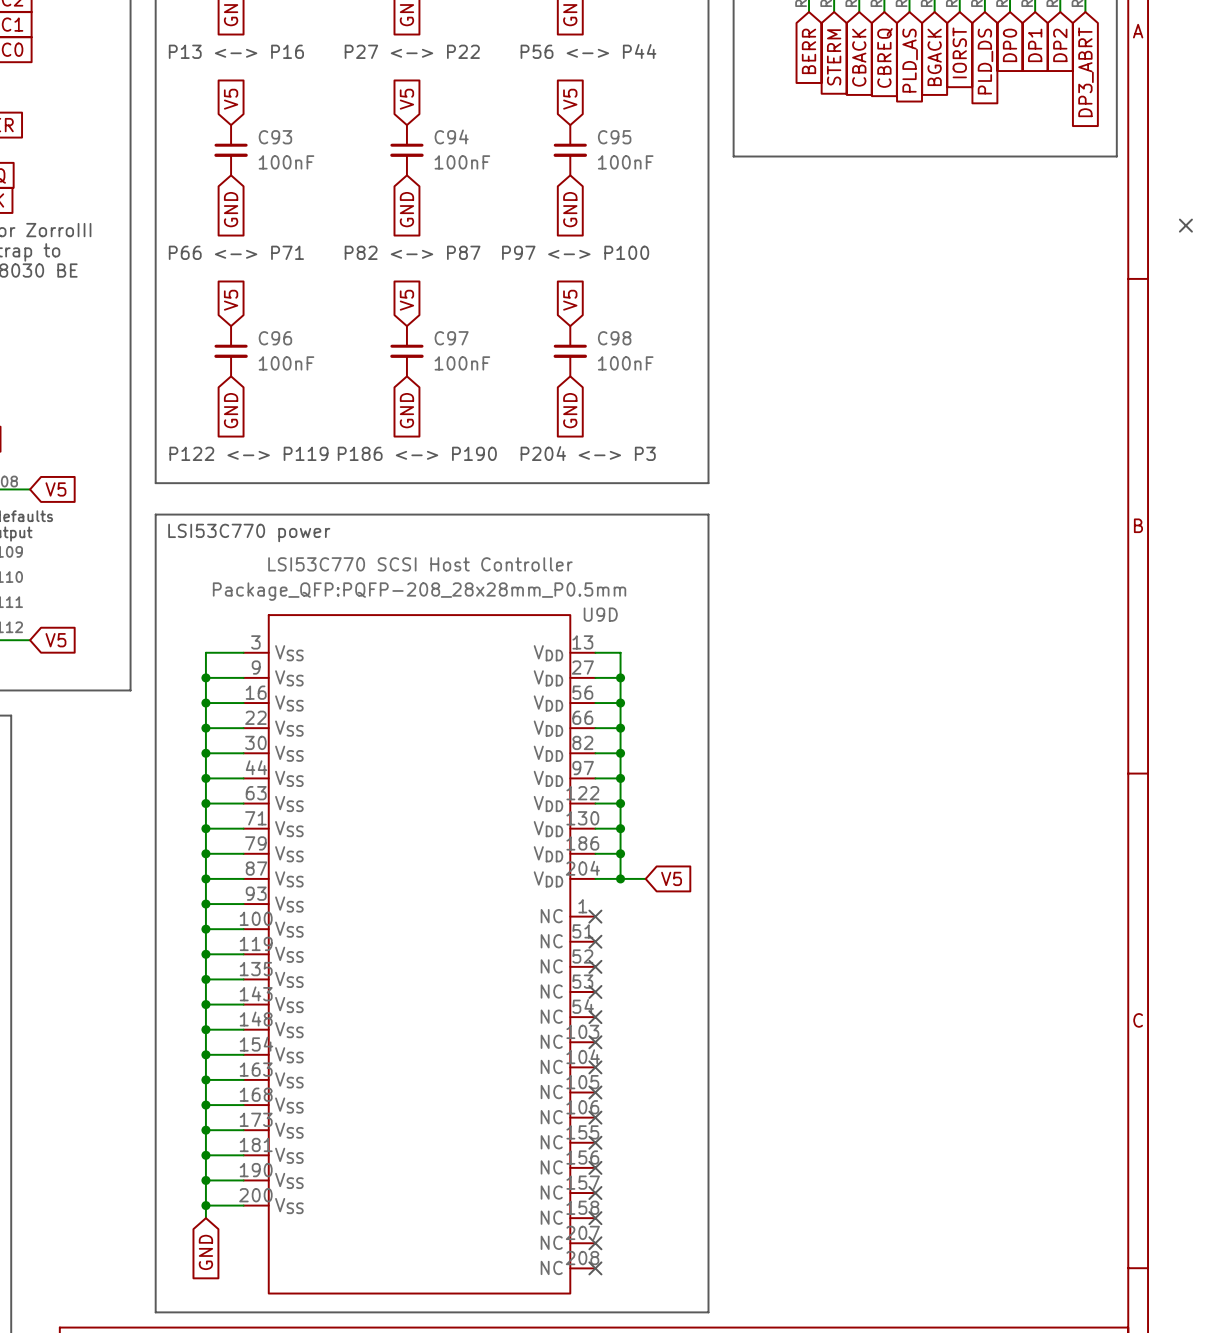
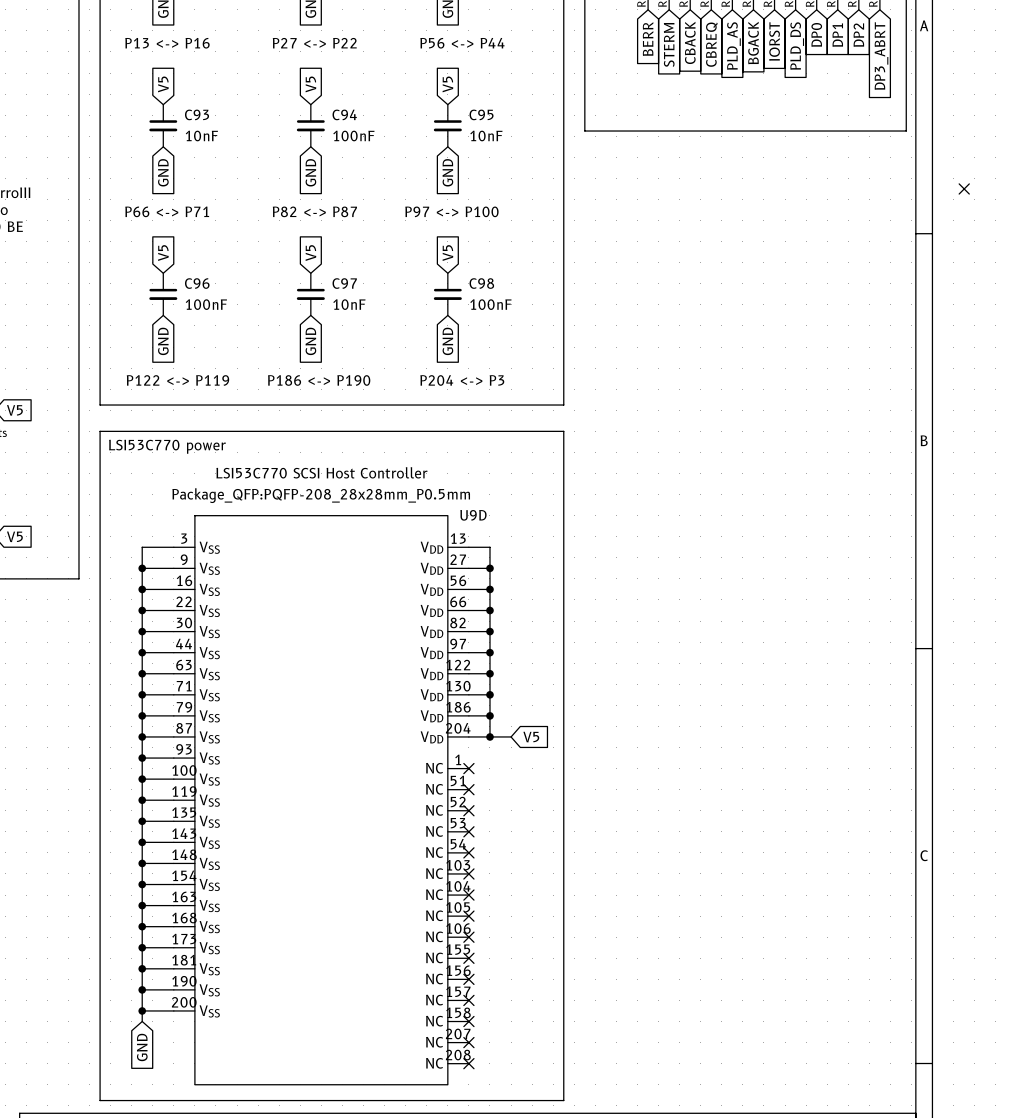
C93 value: 100nF (286, 162) -> 10nF (201, 135)
C95 value: 100nF (625, 162) -> 10nF (486, 135)
C97 value: 100nF (462, 363) -> 10nF (349, 304)

